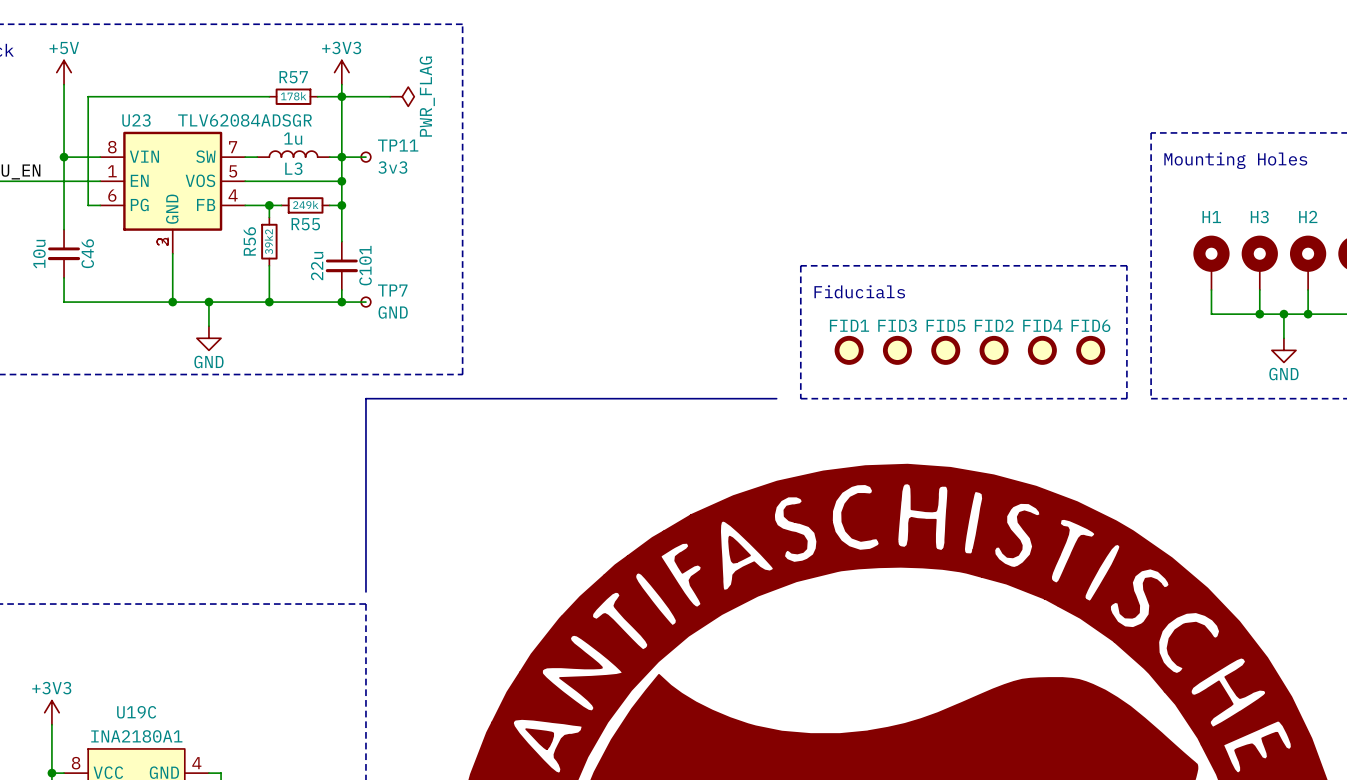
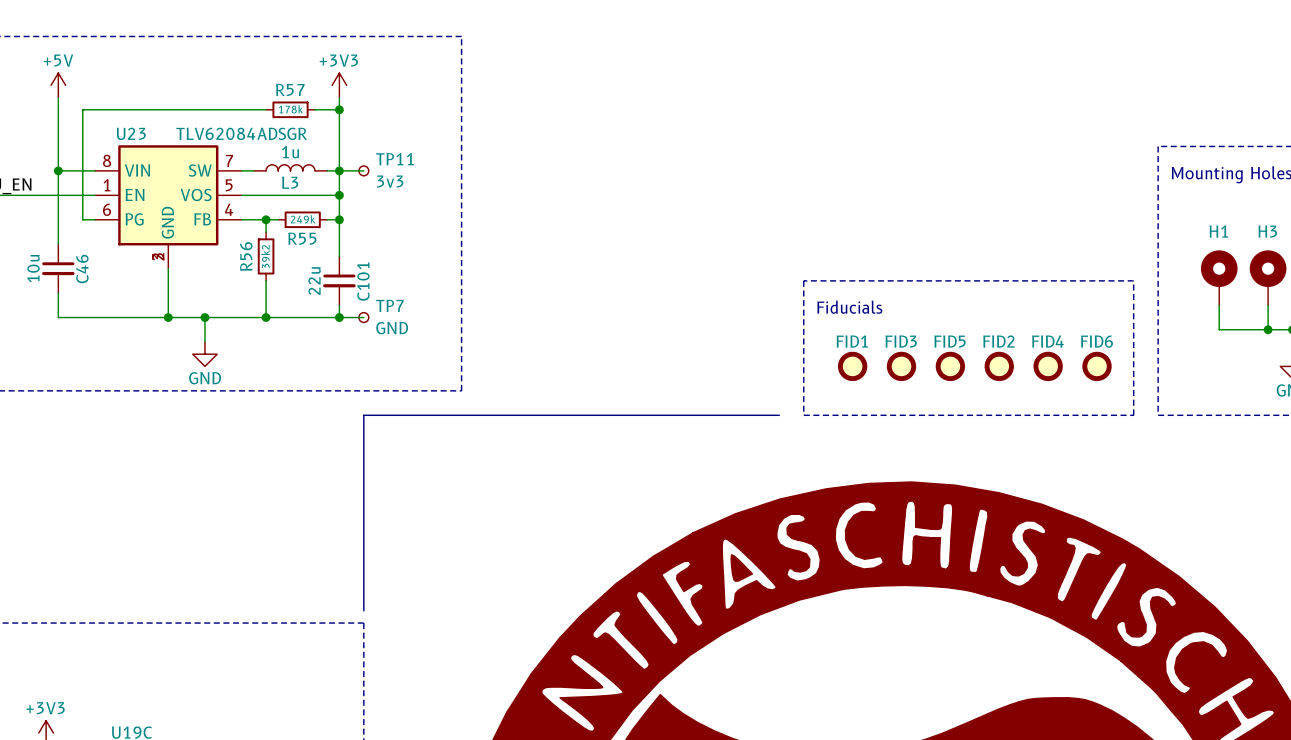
wire: (341, 96) (390, 96) -> none
power symbol: PWR_FLAG (402, 96) -> none

